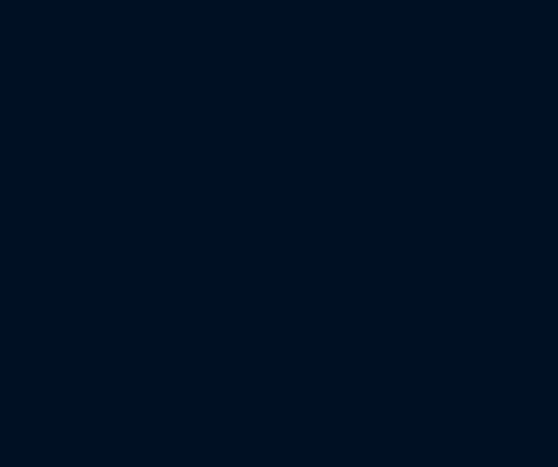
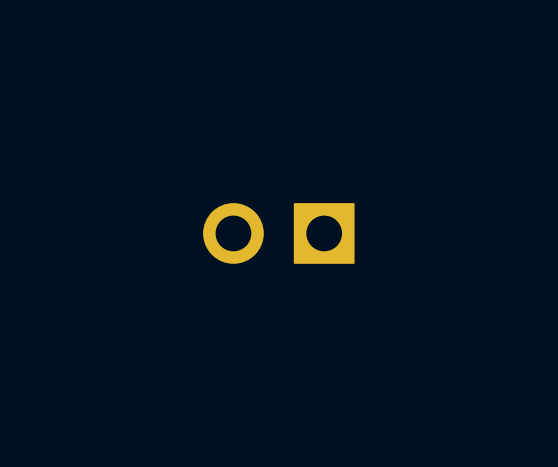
part: none -> (278, 233)

